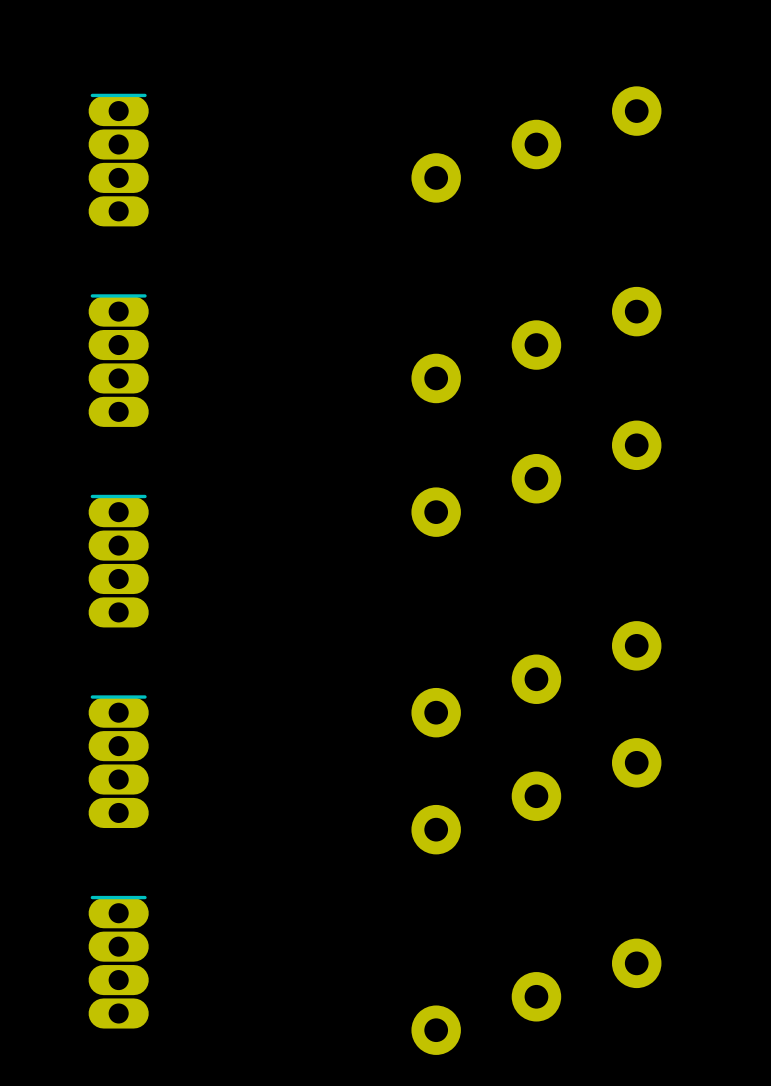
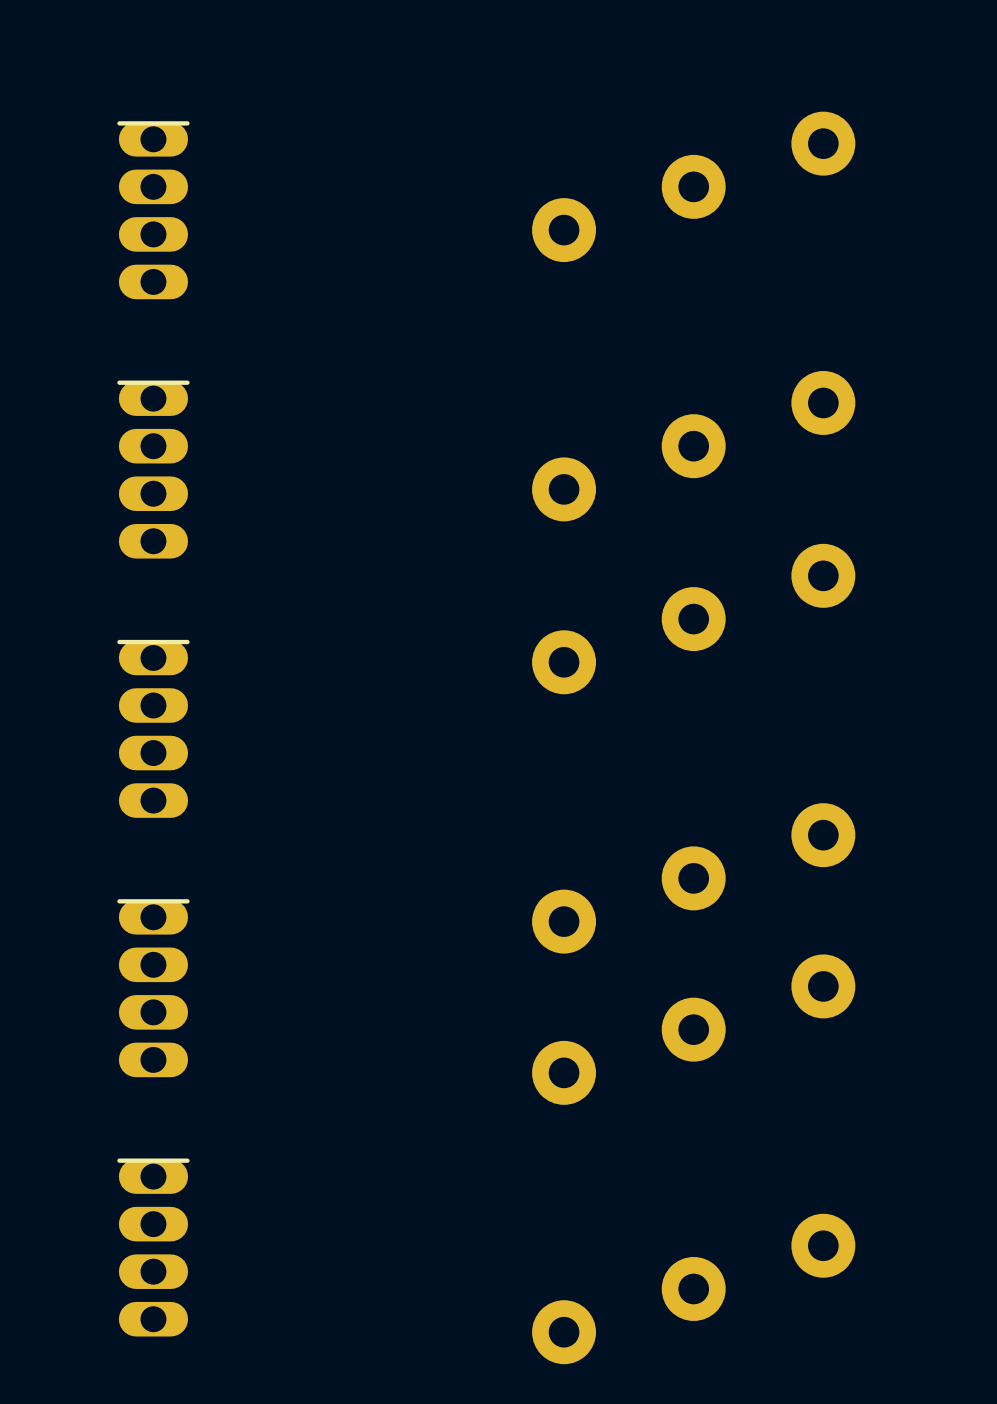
part footprint: [88, 93, 149, 227] -> [117, 121, 190, 300]
part footprint: [88, 294, 149, 427] -> [117, 380, 190, 559]
part footprint: [88, 494, 149, 628] -> [117, 639, 190, 818]
part footprint: [88, 695, 149, 828] -> [117, 899, 190, 1078]
part footprint: [88, 895, 149, 1029] -> [117, 1158, 190, 1337]

